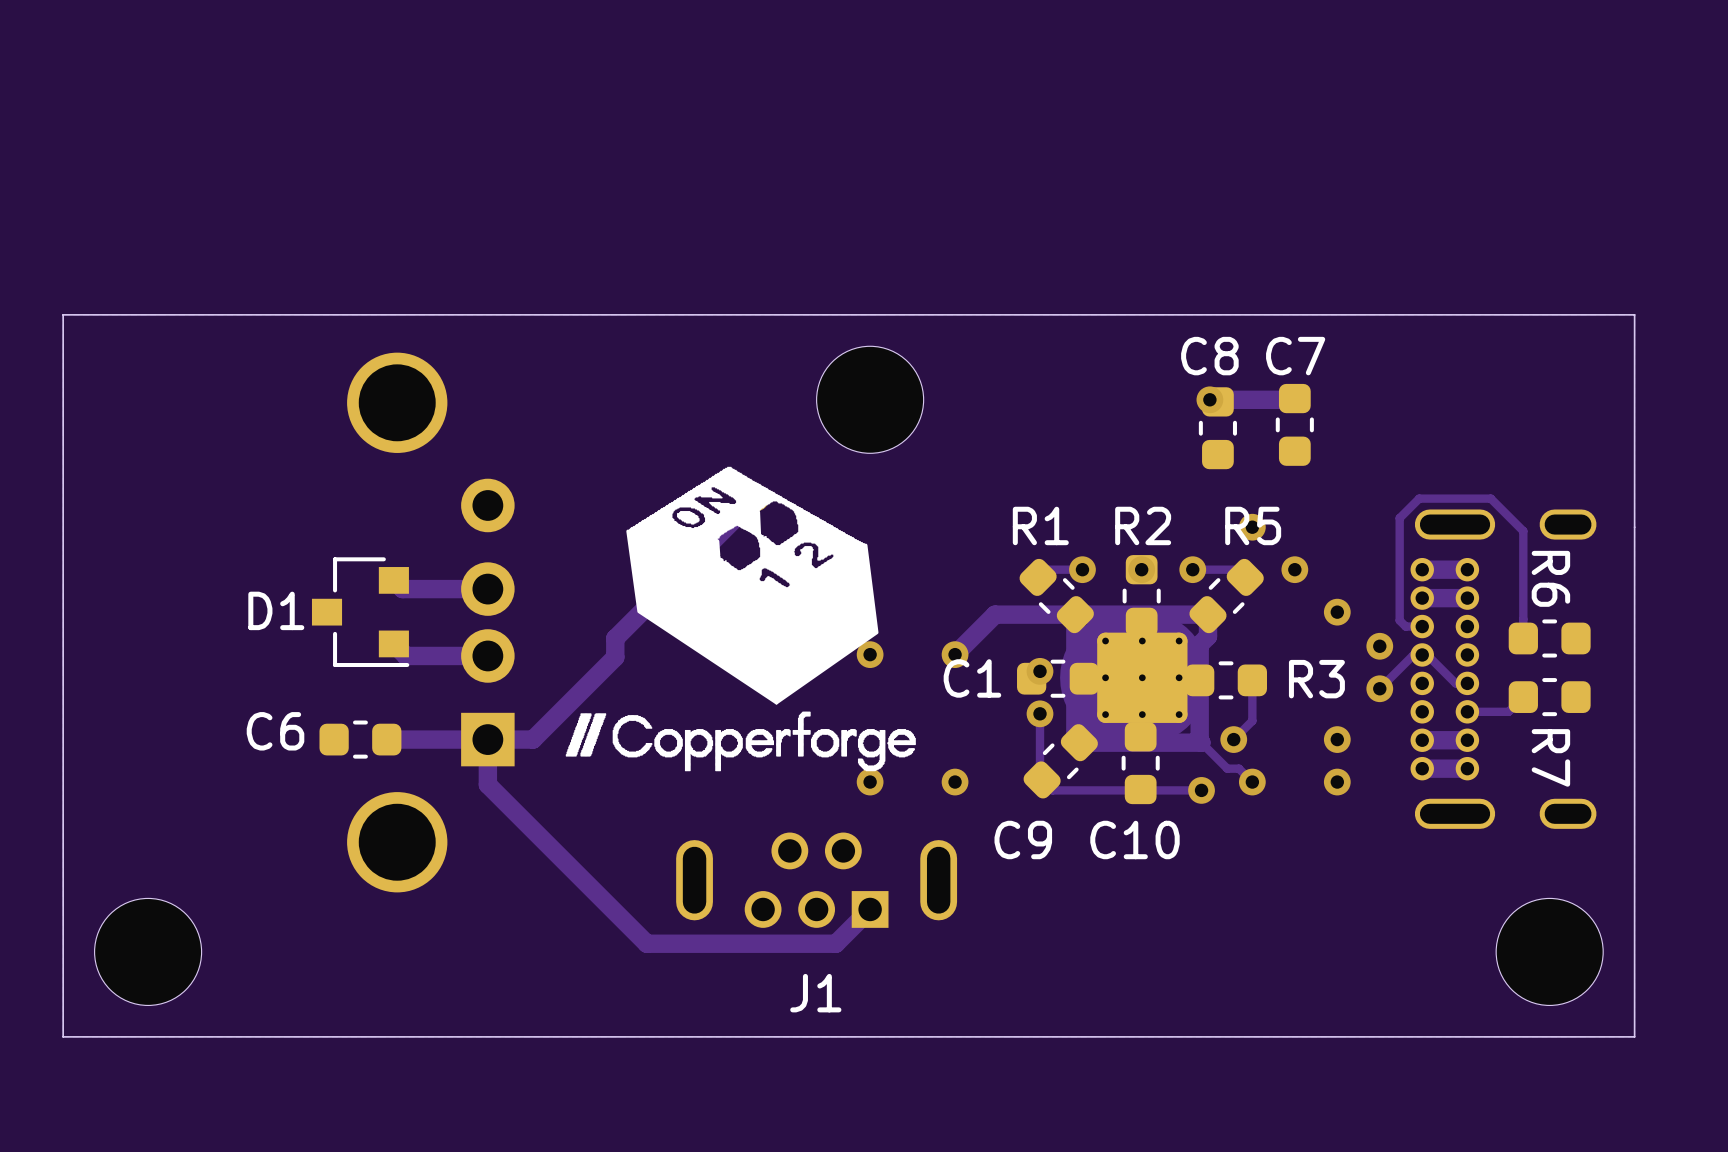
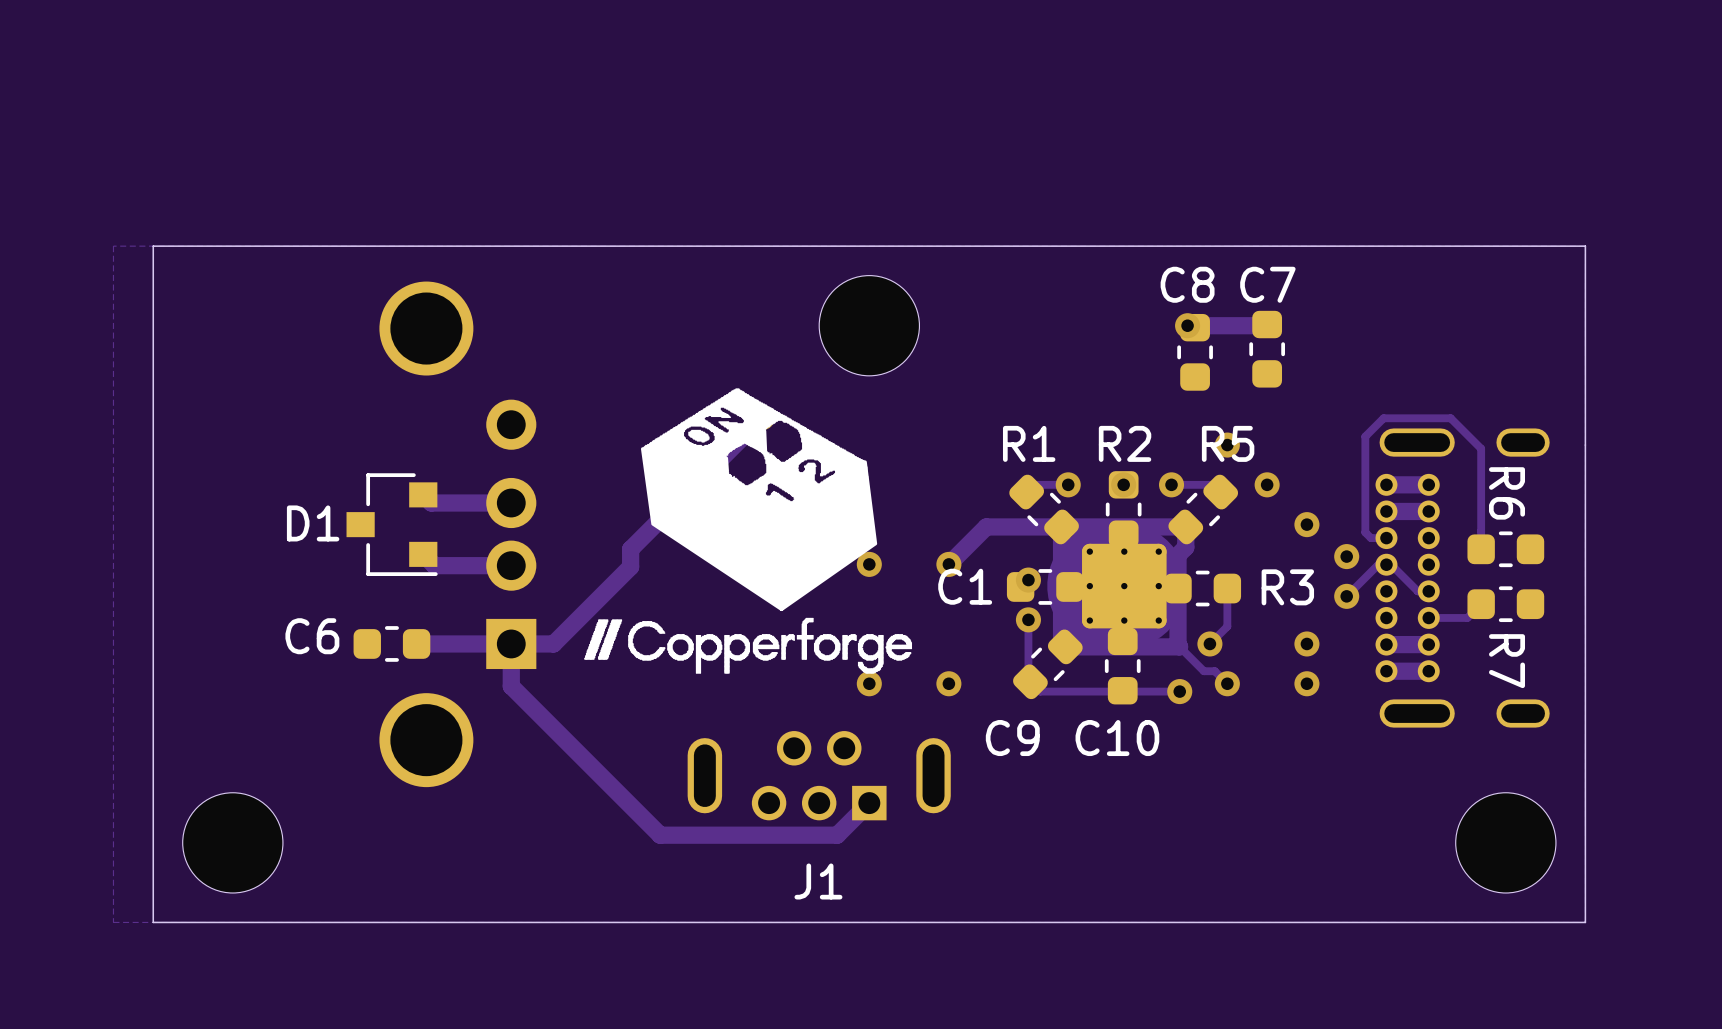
board edge: (105, 314) (63, 314) (63, 1036) (105, 1036) -> (153, 246) (153, 922)
part position: (148, 951) -> (232, 842)

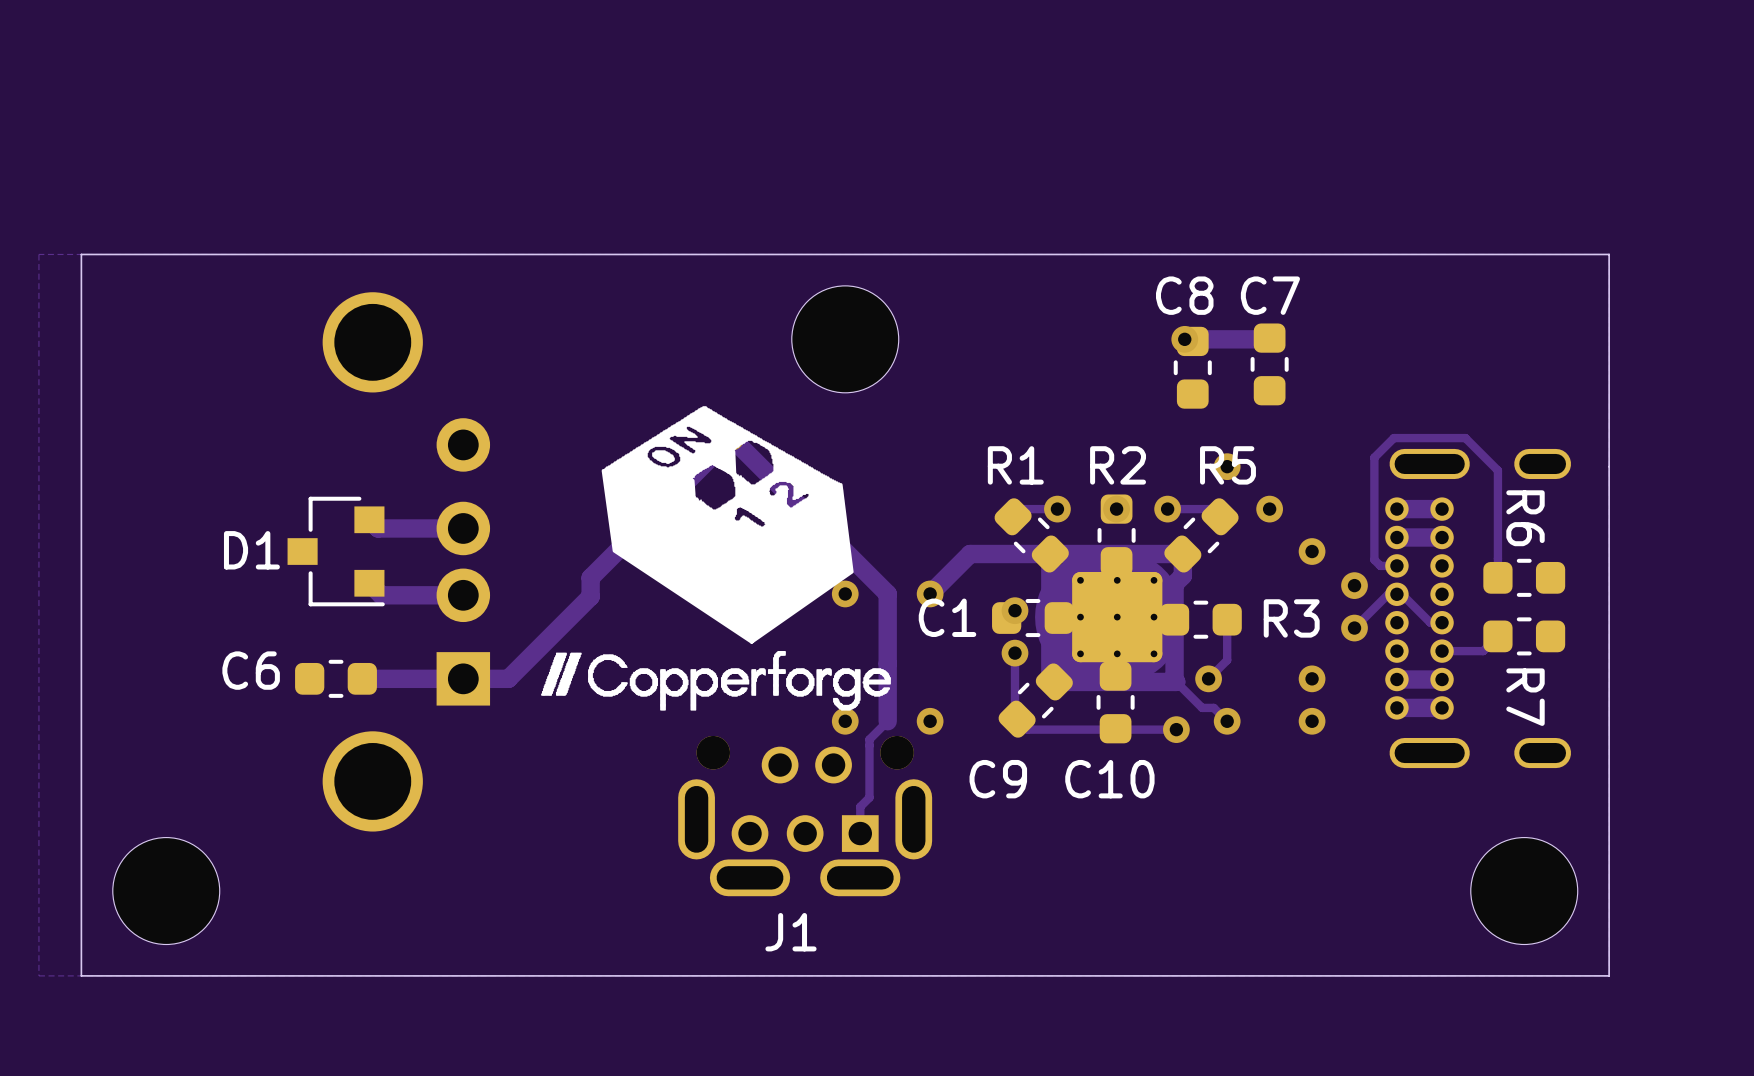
track: none -> (869, 575) (731, 437) (887, 593) (887, 721) (869, 739) (869, 797) (860, 806) (860, 833)
track: (511, 643) (511, 686) (660, 835) (837, 835) (869, 803) -> none
J1 footprint: [687, 731, 951, 821] -> [678, 735, 933, 897]

